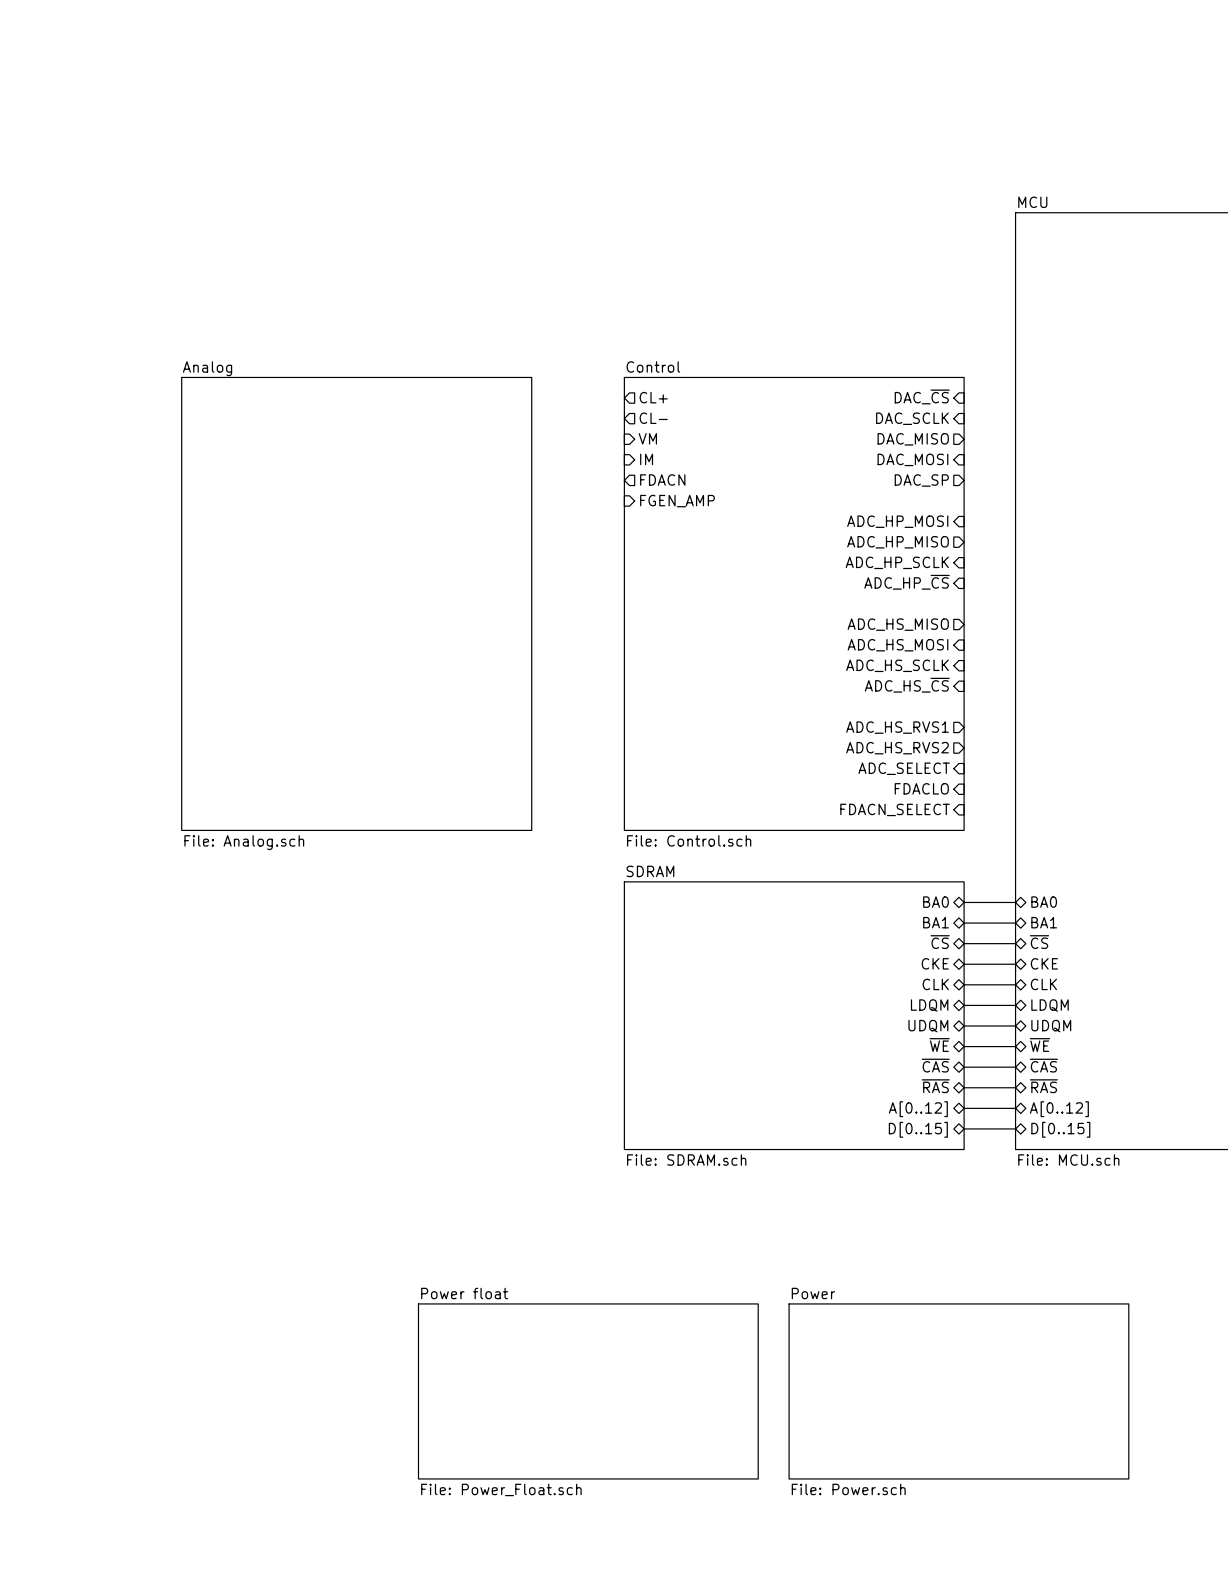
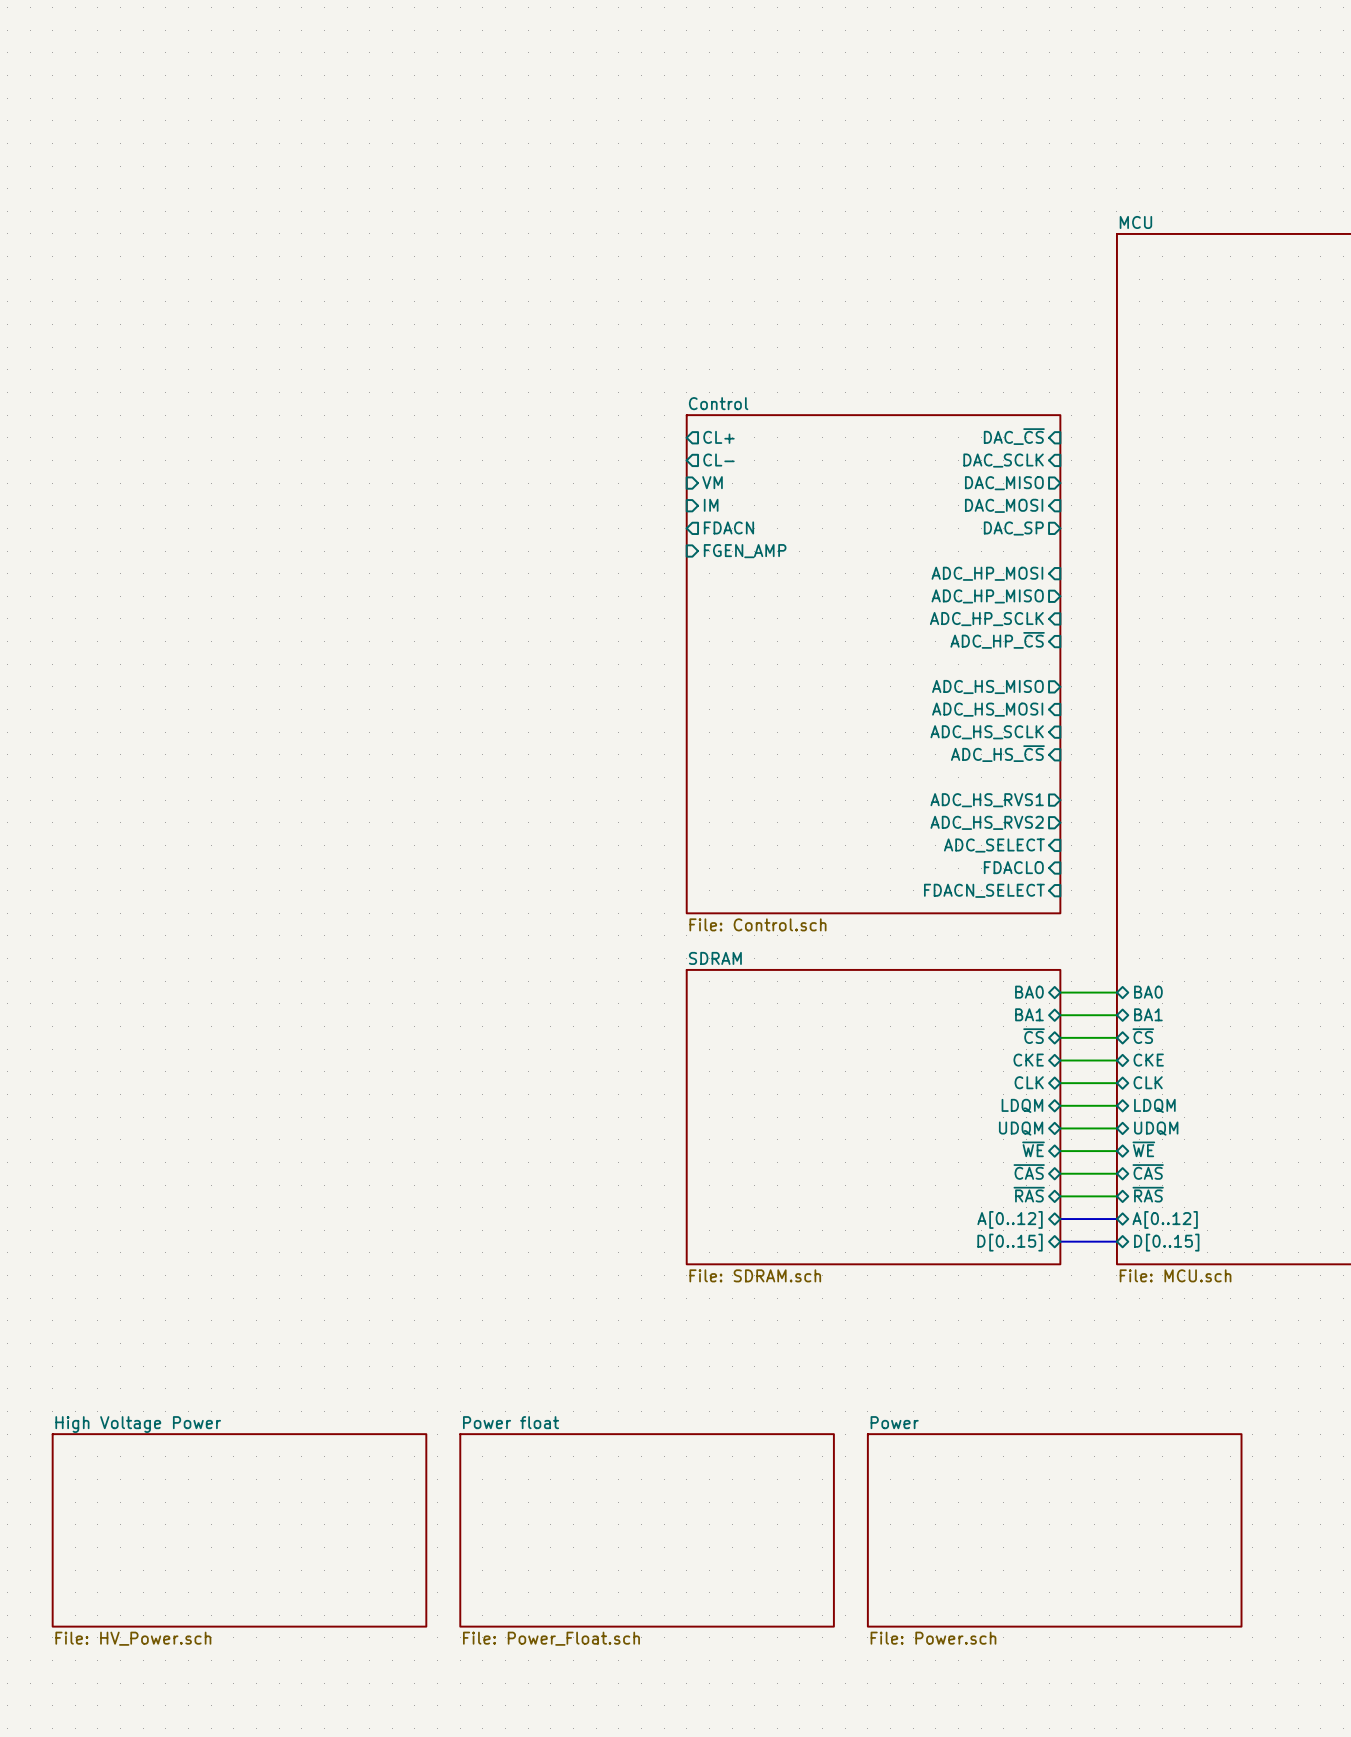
sheet Analog: File: Analog.sch (356, 603) -> none
sheet High Voltage Power: none -> File: HV_Power.sch (239, 1530)

